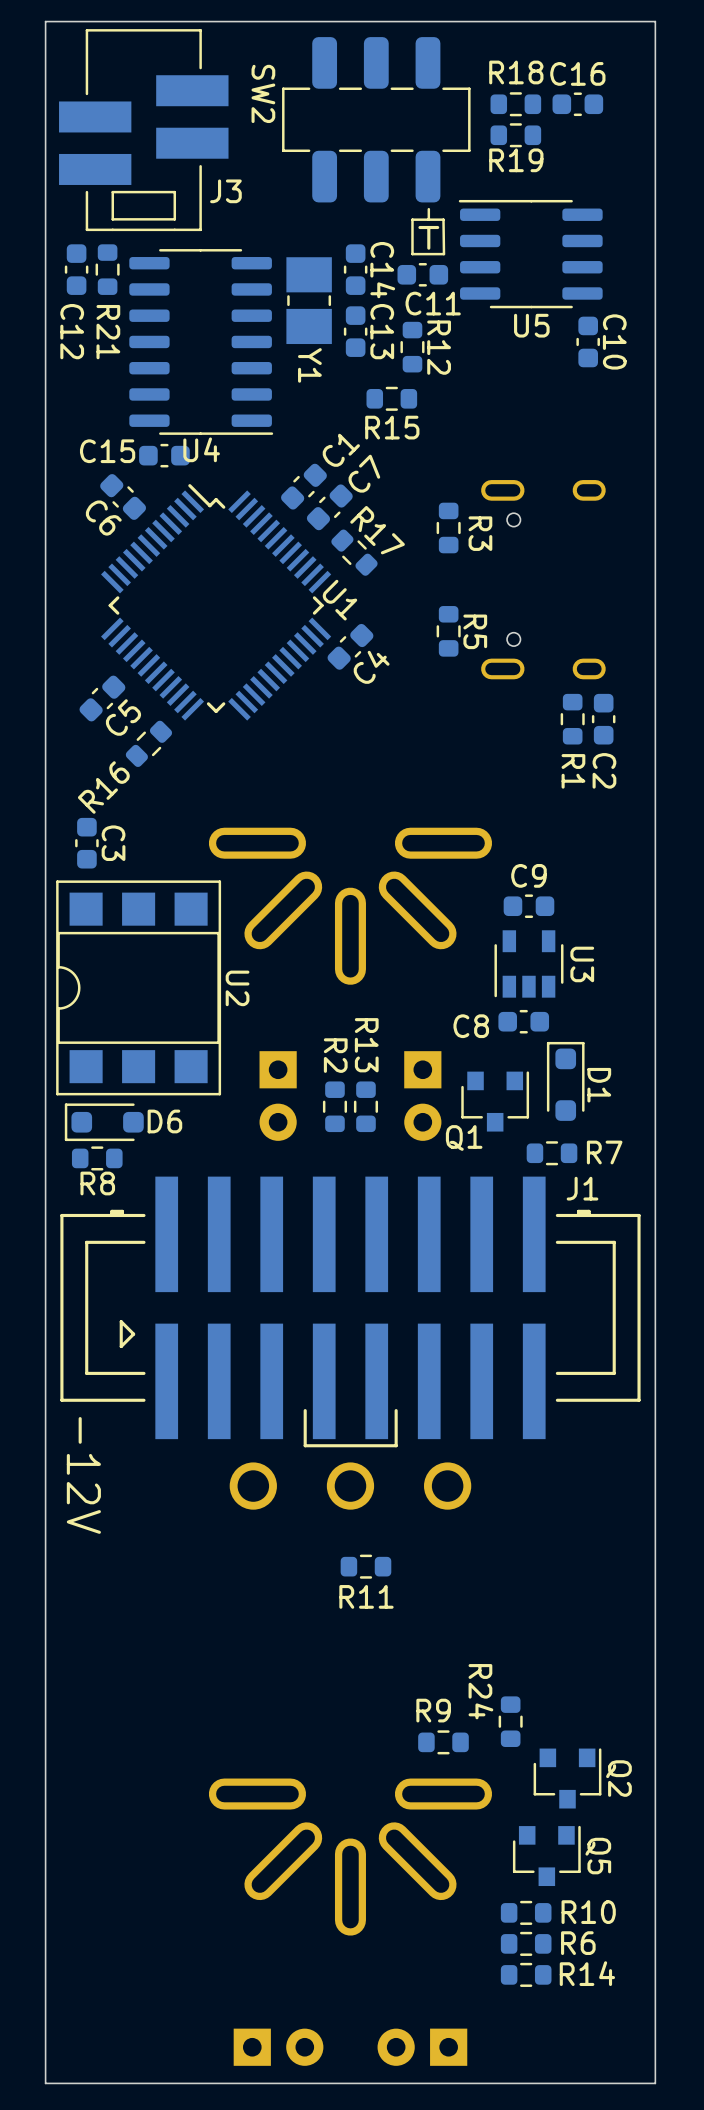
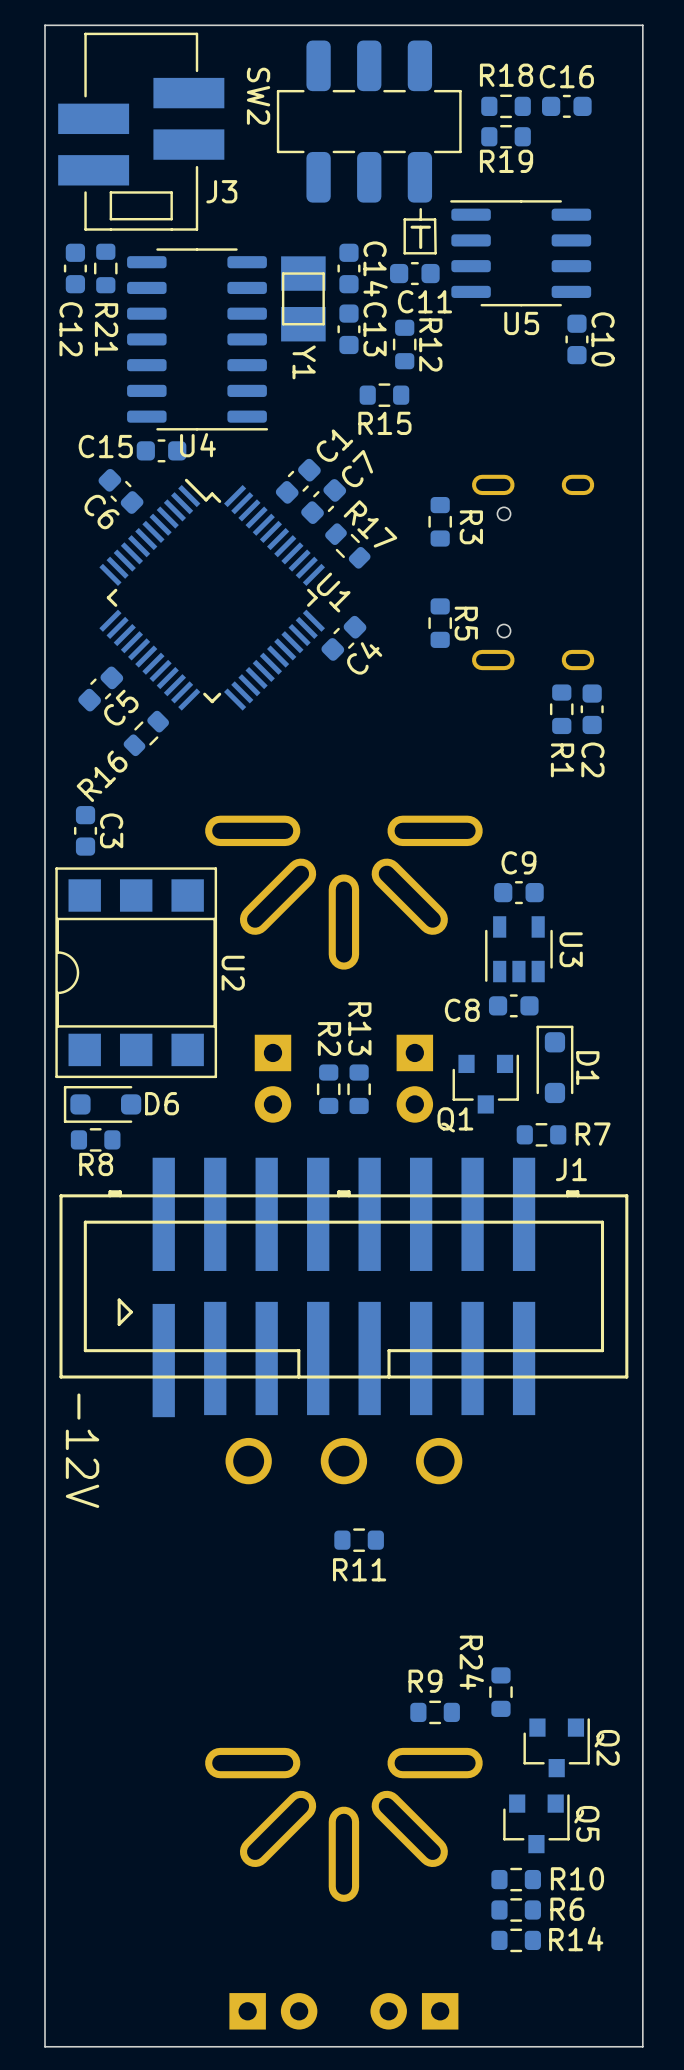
Y1 footprint: [286, 257, 332, 345] -> [281, 256, 326, 342]
J1 footprint: [60, 1176, 641, 1448] -> [59, 1157, 629, 1418]

